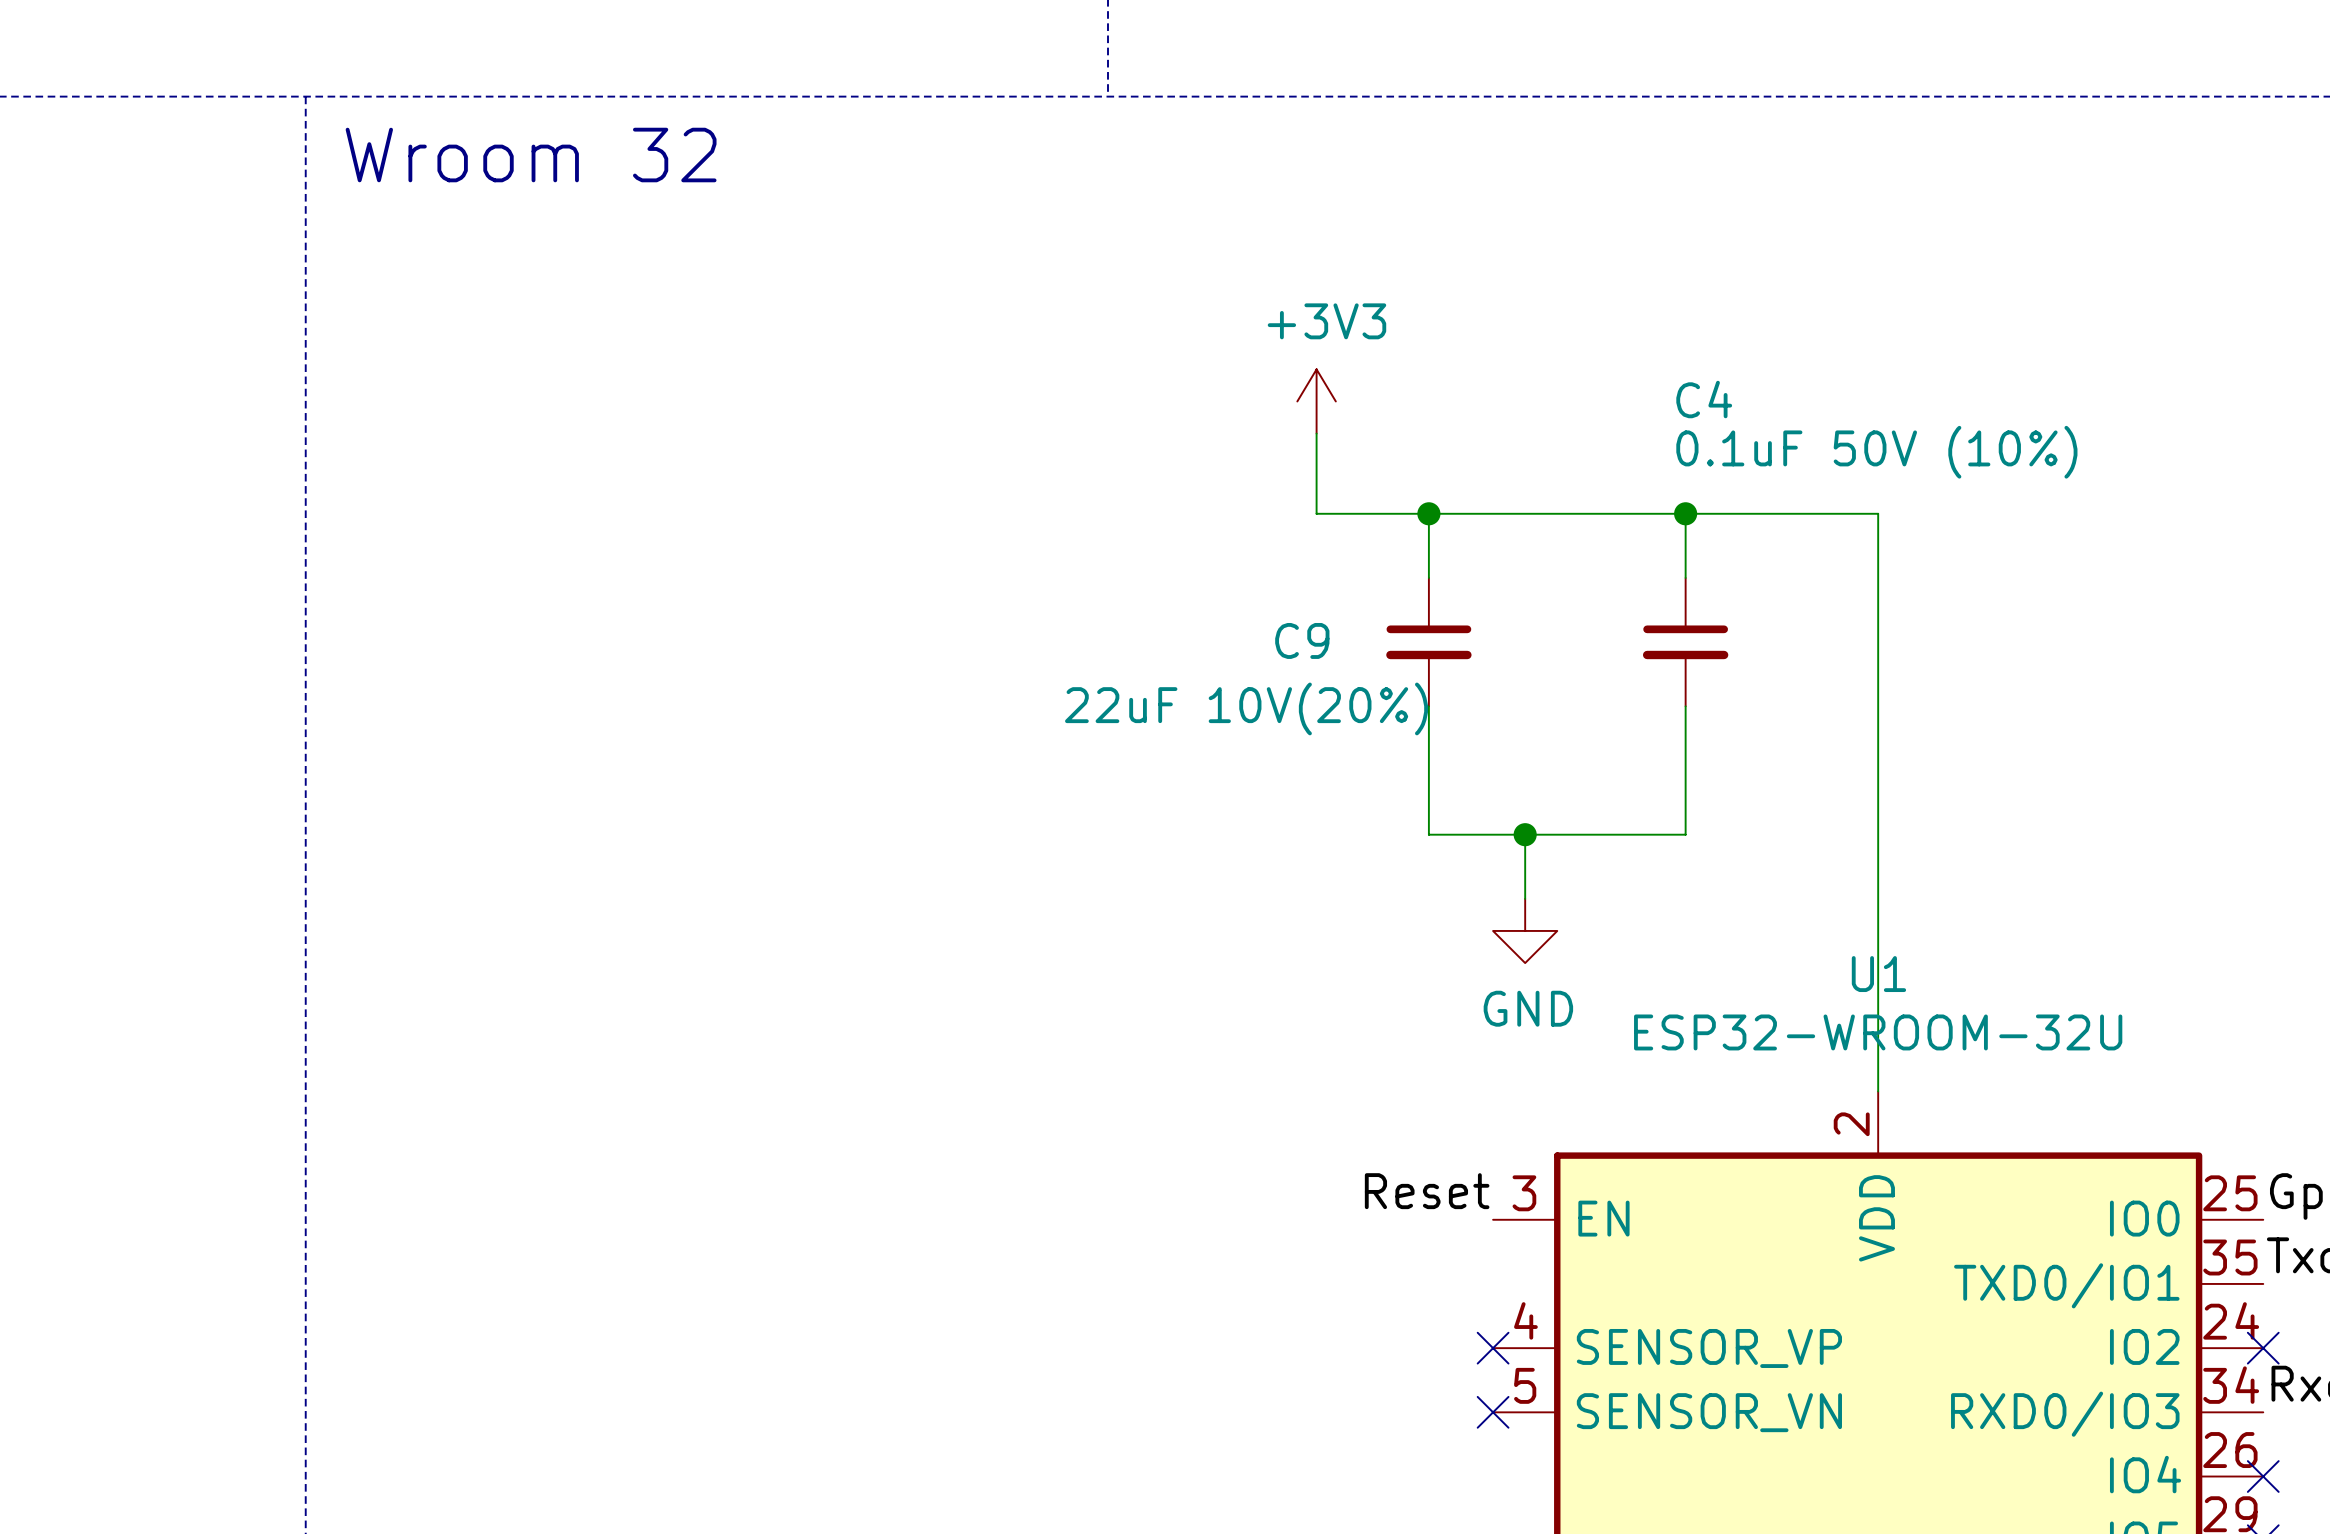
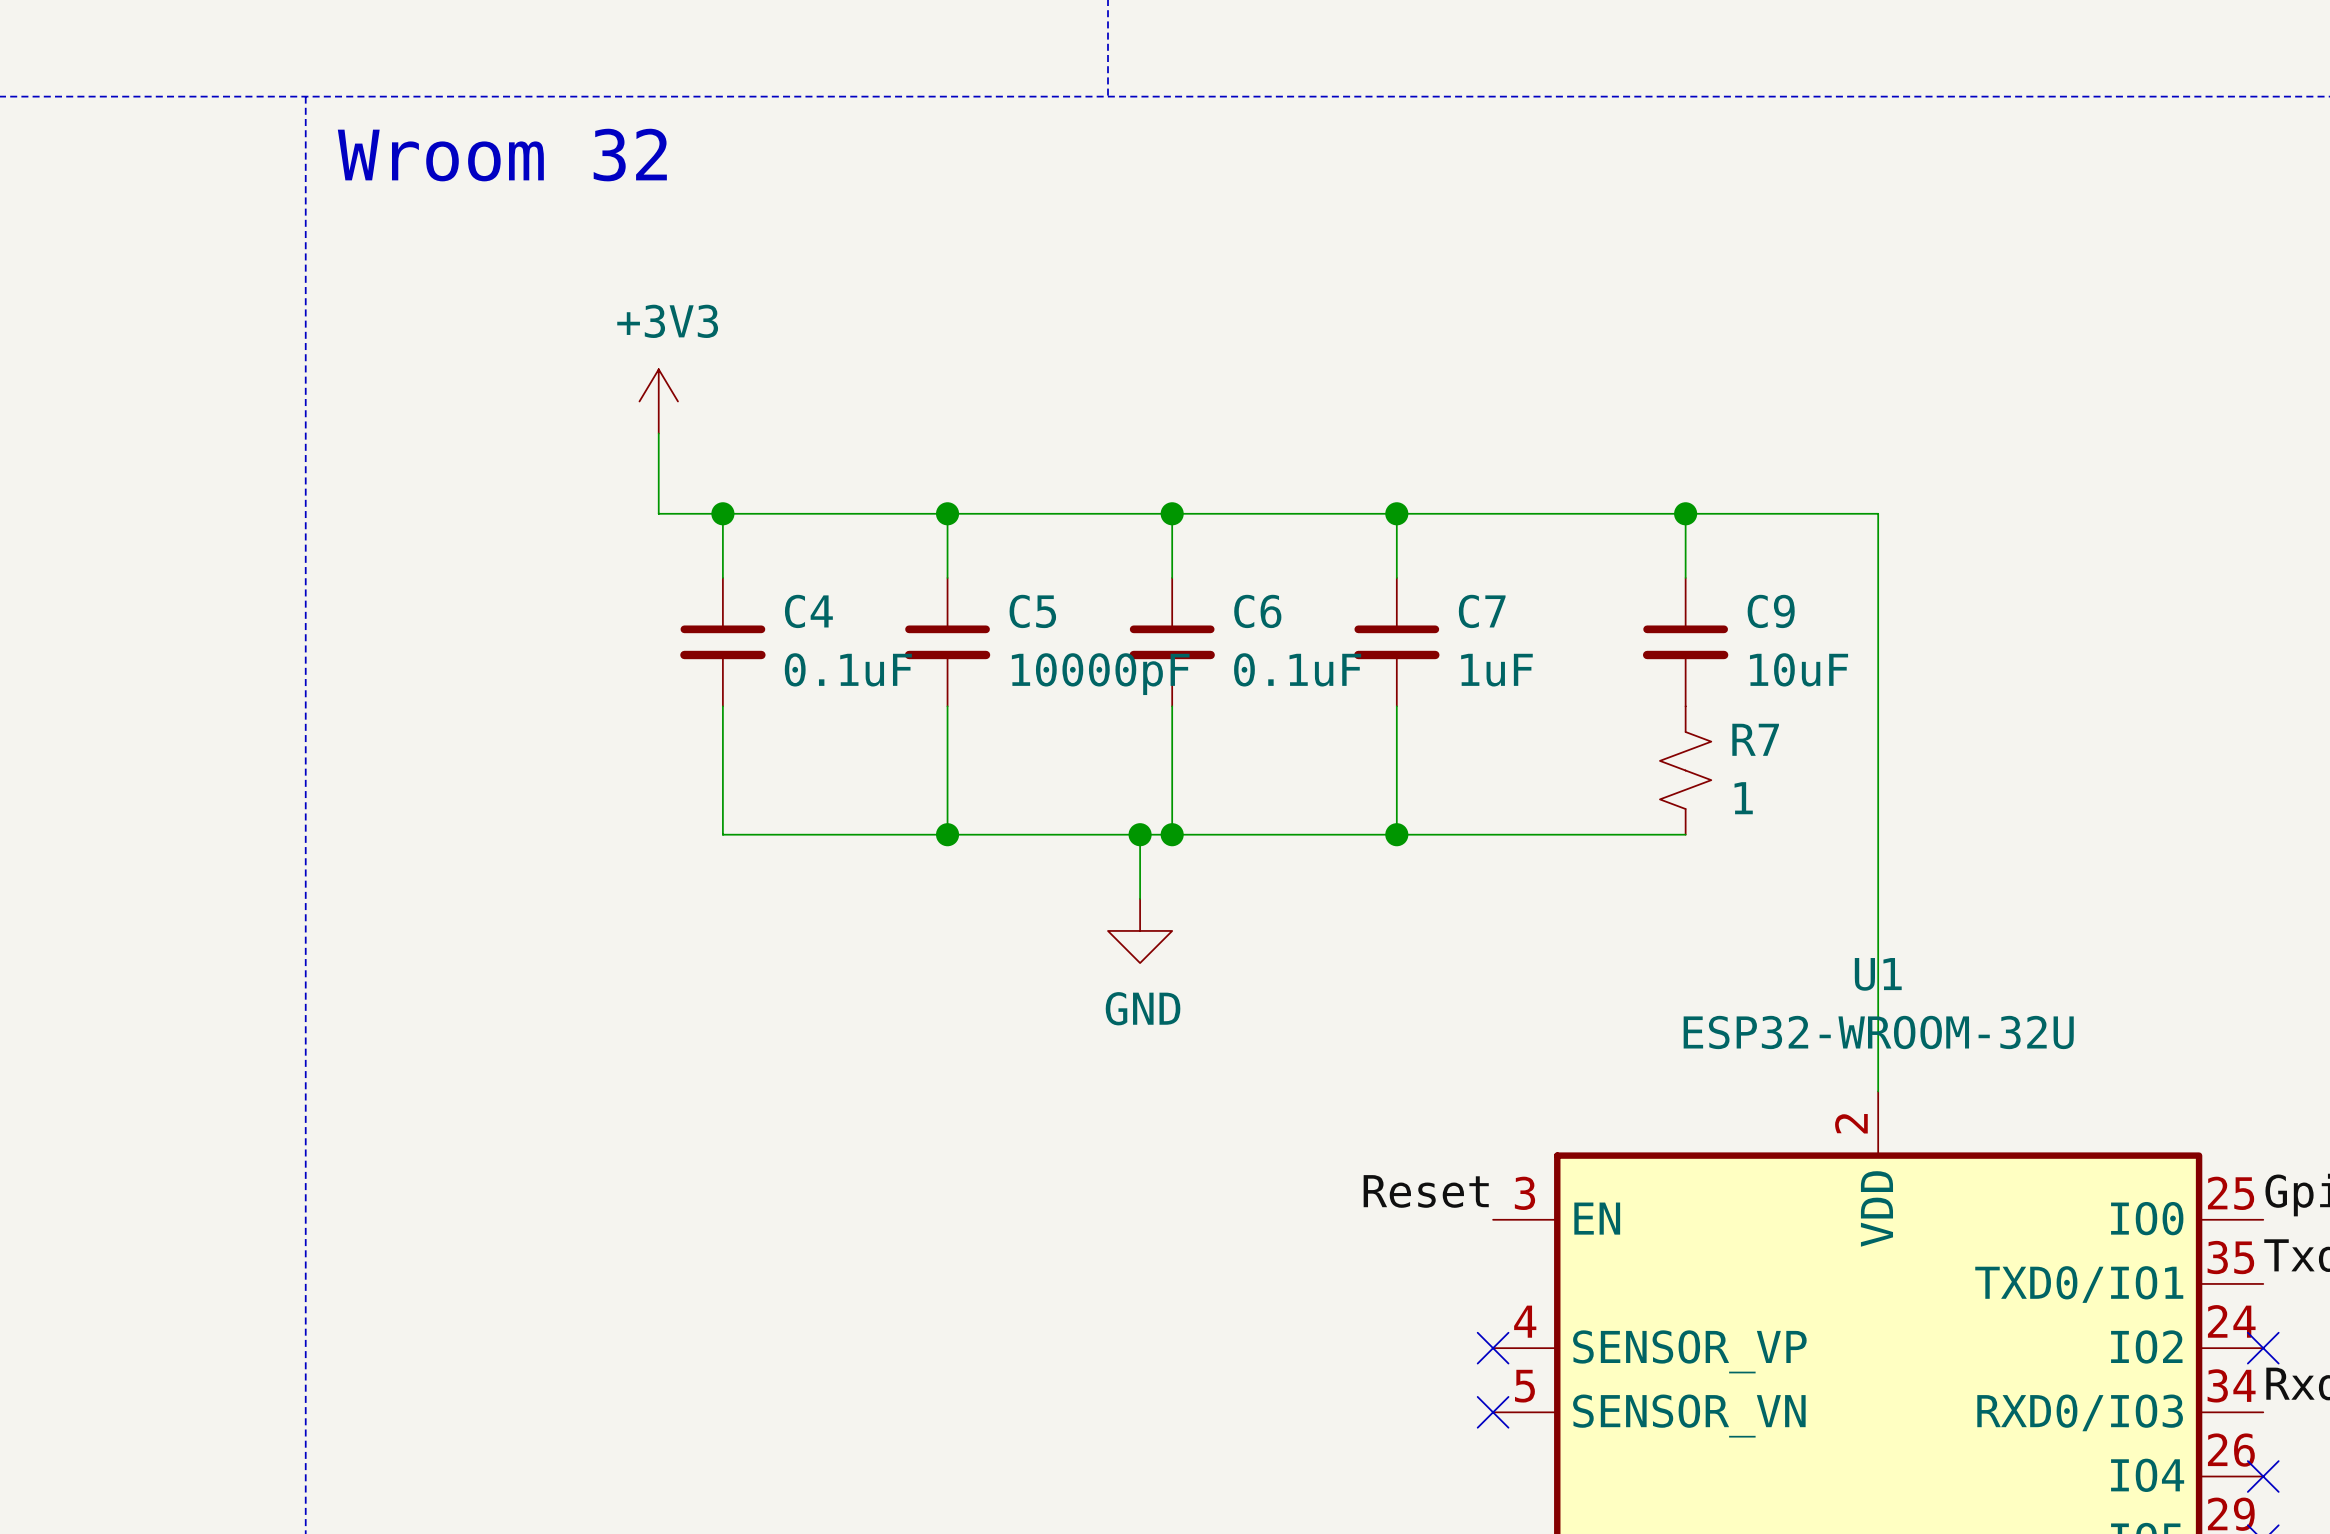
C4 name: C4 (1704, 399) -> C9 (1771, 611)
power symbol: none -> +3V3 (658, 401)
power symbol: +3V3 (1316, 401) -> none
wire: (1316, 433) (1316, 513) -> (658, 433) (658, 513) (1316, 513)
C4 value: 0.1uF 50V (10%) (1876, 452) -> 10uF (1799, 669)
wire: none -> (722, 513) (722, 577)
junction: none -> (722, 513)
wire: none -> (947, 513) (947, 577)
junction: none -> (947, 513)
wire: none -> (1172, 513) (1172, 577)
junction: none -> (1172, 513)
wire: (1428, 513) (1428, 577) -> (1396, 513) (1396, 577)
junction position: (1428, 513) -> (1396, 513)
C4: none -> 0.1uF (722, 642)
C5: none -> 10000pF (947, 642)
C6: none -> 0.1uF (1172, 642)
C7: none -> 1uF (1396, 642)
C9: 22uF 10V(20%) (1428, 642) -> none
wire: none -> (947, 706) (947, 834)
wire: none -> (1172, 706) (1172, 834)
wire: (1428, 706) (1428, 834) -> (722, 706) (722, 834) (1428, 834)
wire: (1685, 706) (1685, 834) -> (1396, 706) (1396, 834)
R7: none -> 1 (1685, 770)
junction: none -> (947, 834)
junction: none -> (1140, 834)
junction: none -> (1172, 834)
wire: (1525, 834) (1525, 898) -> (1140, 834) (1140, 898)
junction position: (1525, 834) -> (1396, 834)
power symbol position: GND (1525, 930) -> GND (1140, 930)

